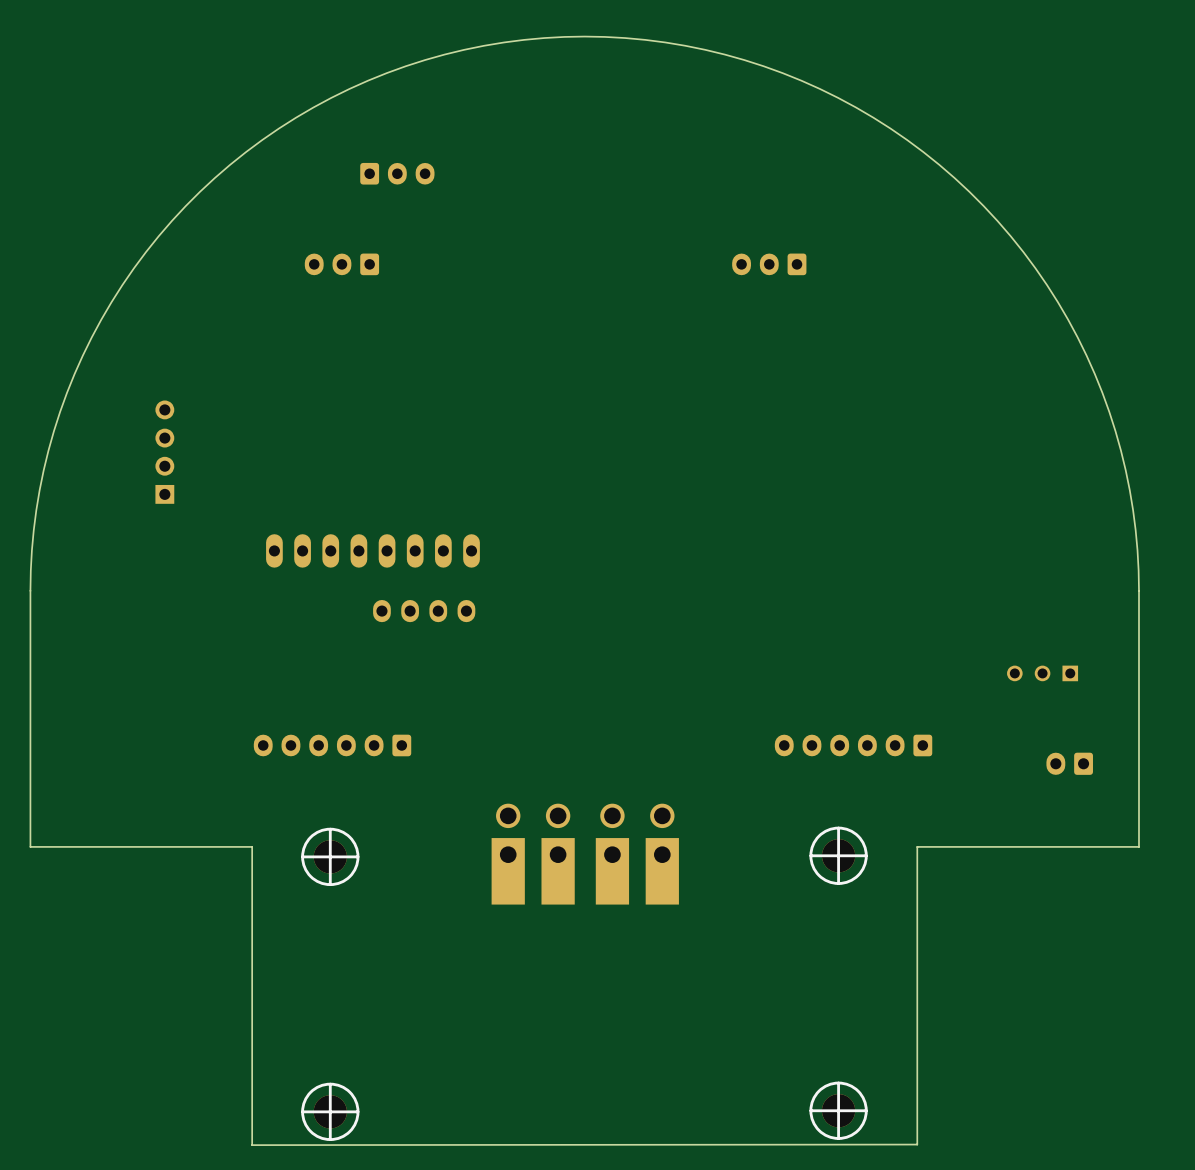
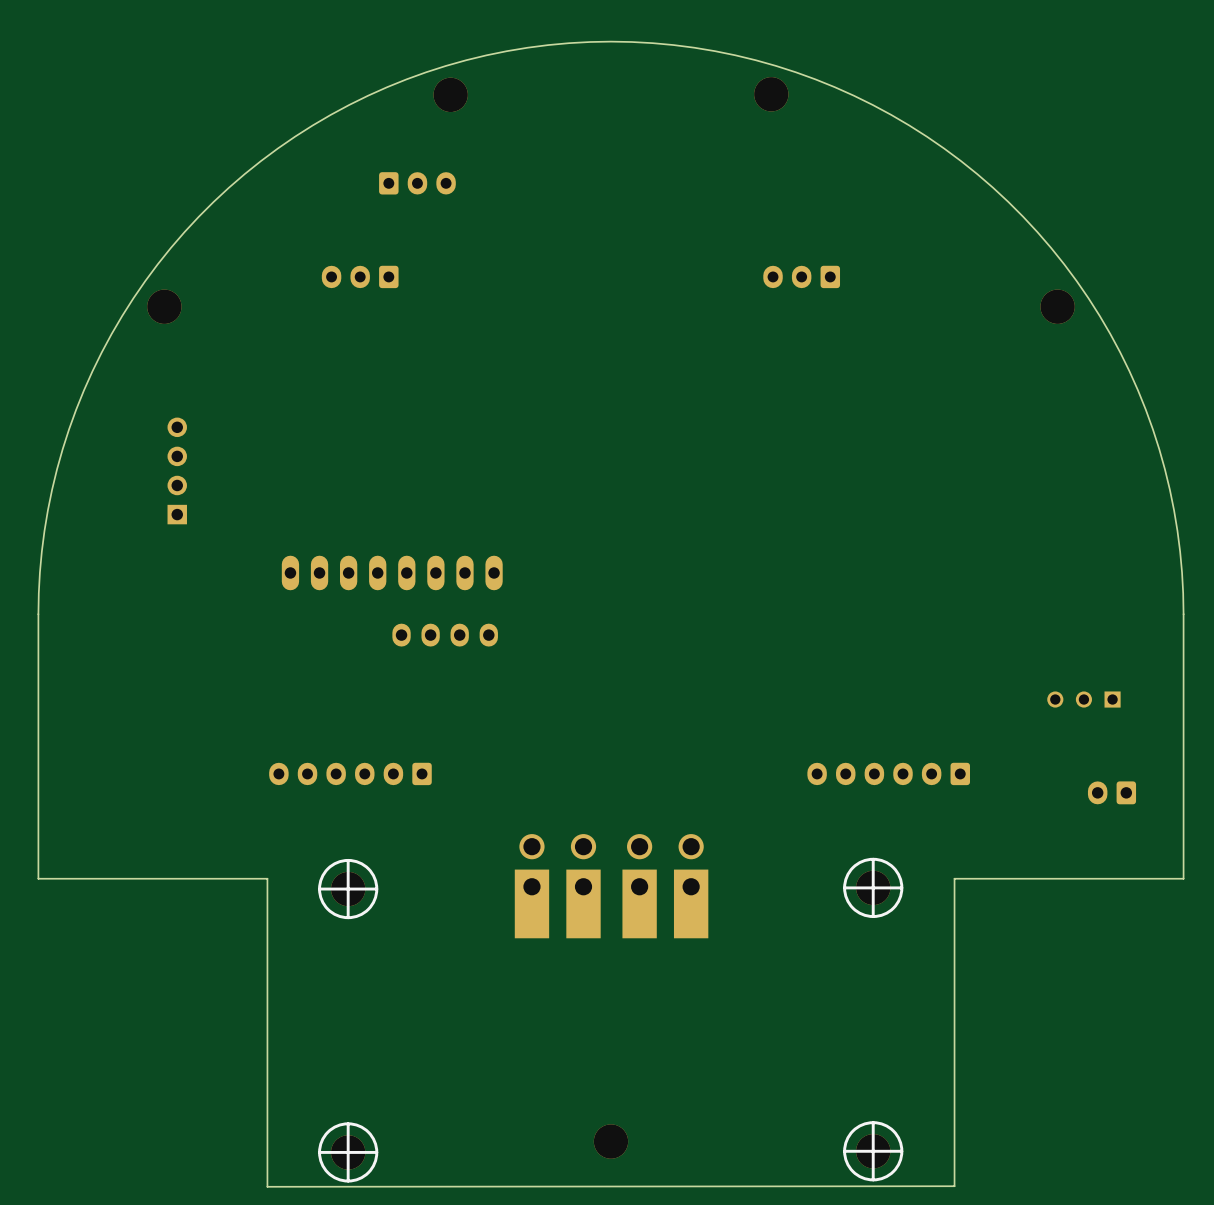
part: none -> (771, 94)
part: none -> (450, 94)
part: none -> (164, 306)
part: none -> (1057, 306)
part: none -> (610, 1141)

